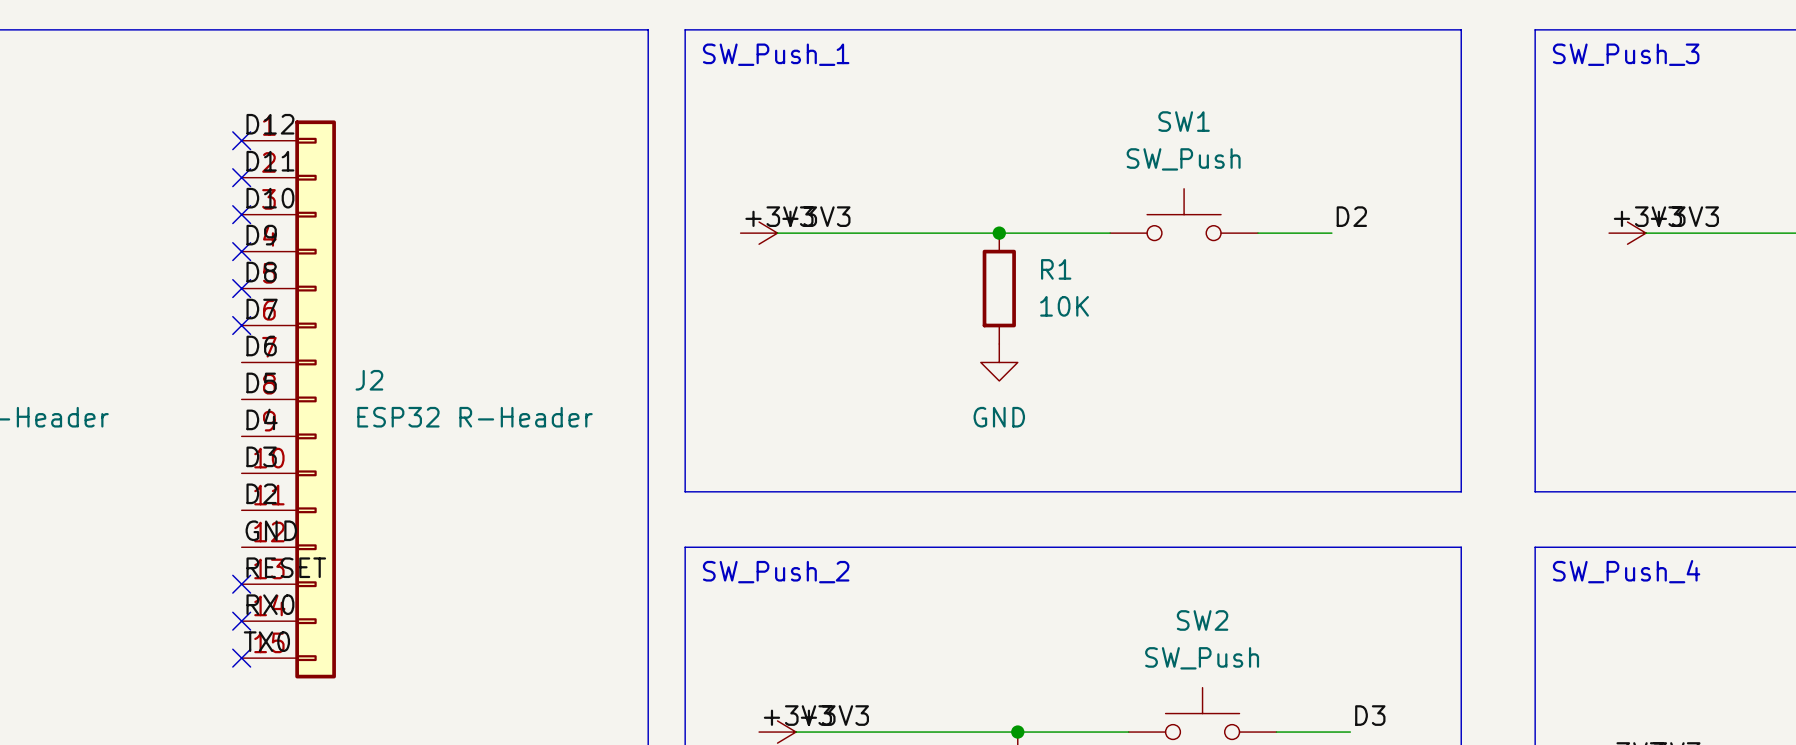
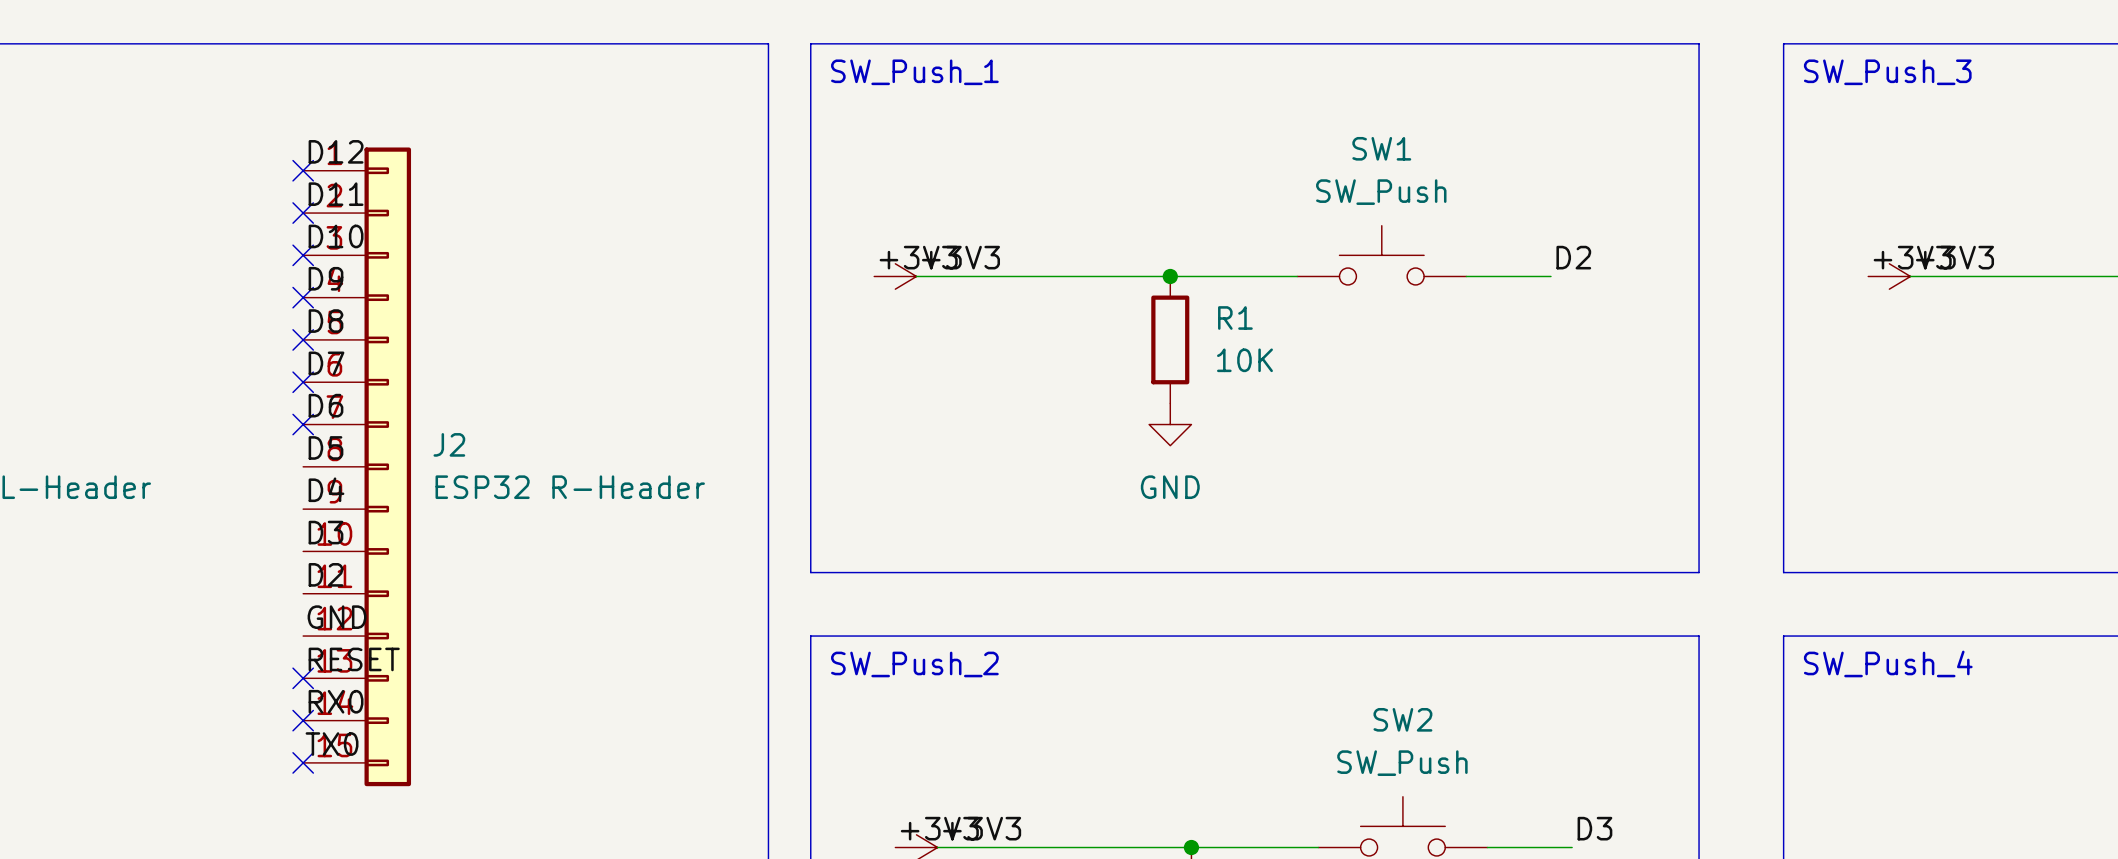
no-connect mark: none -> (303, 424)

